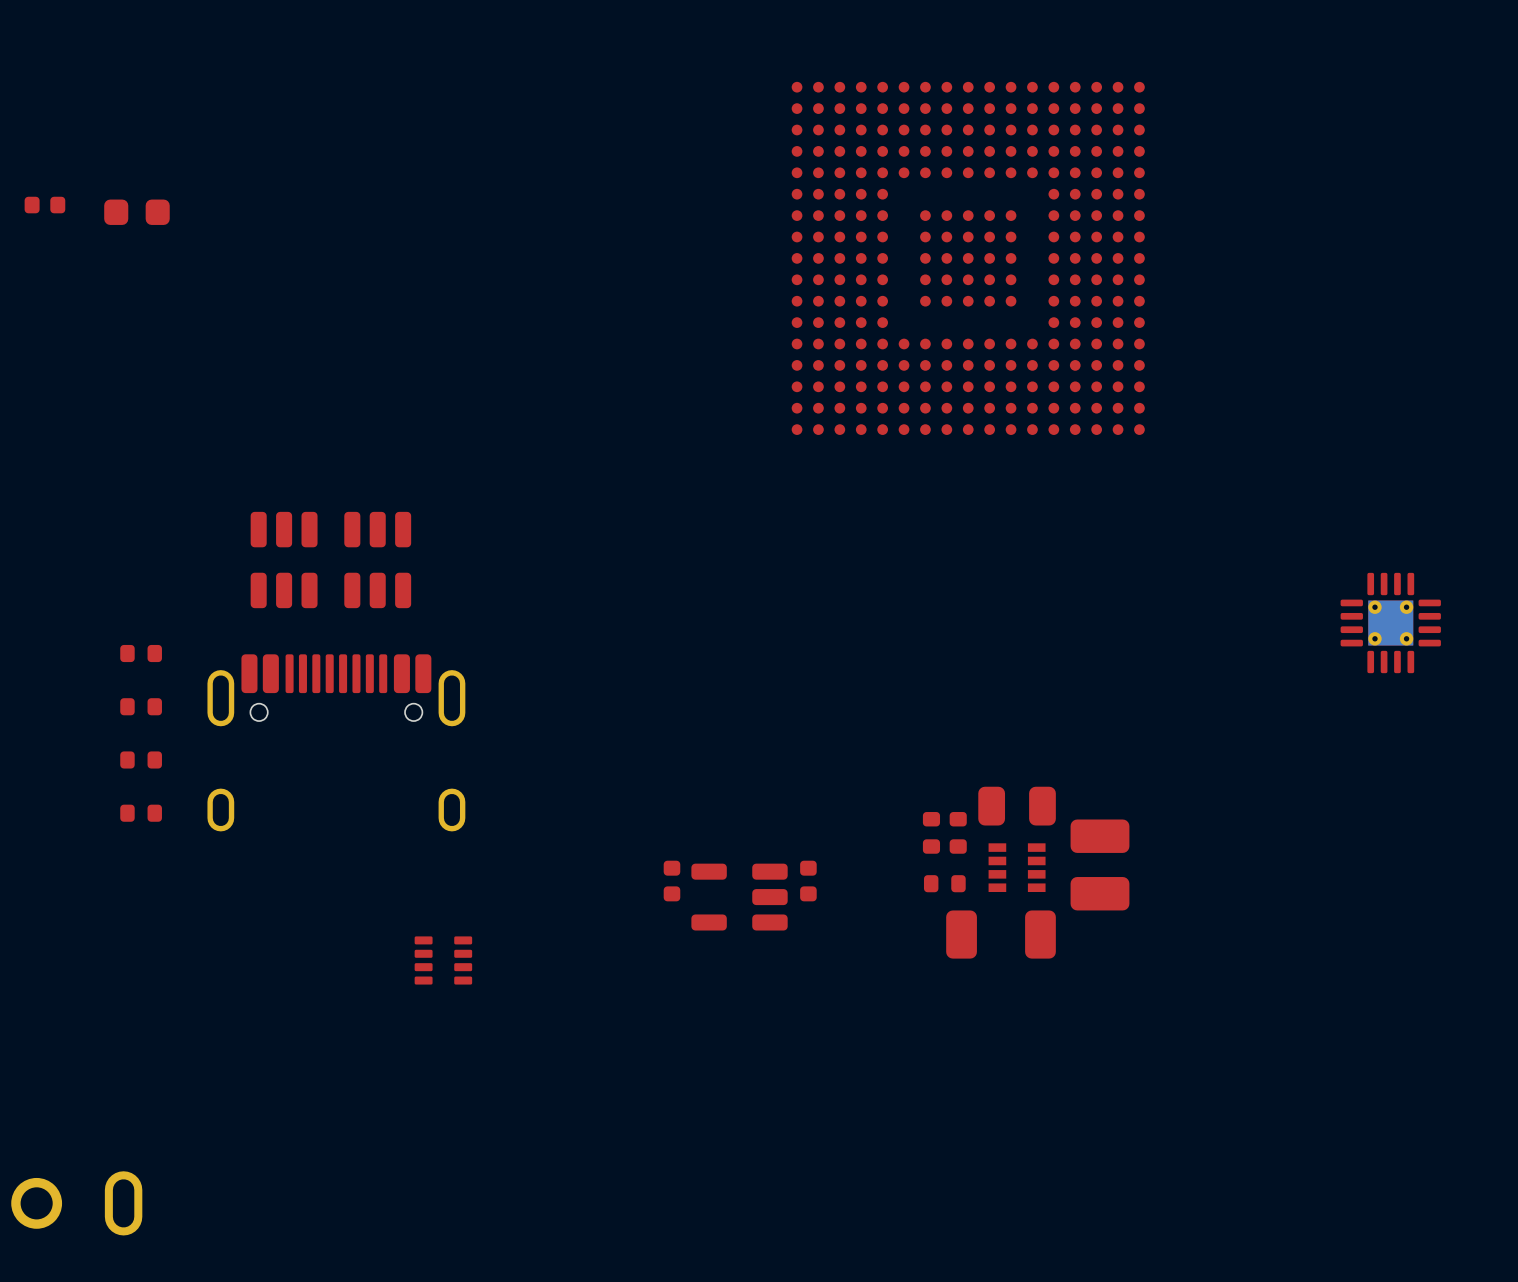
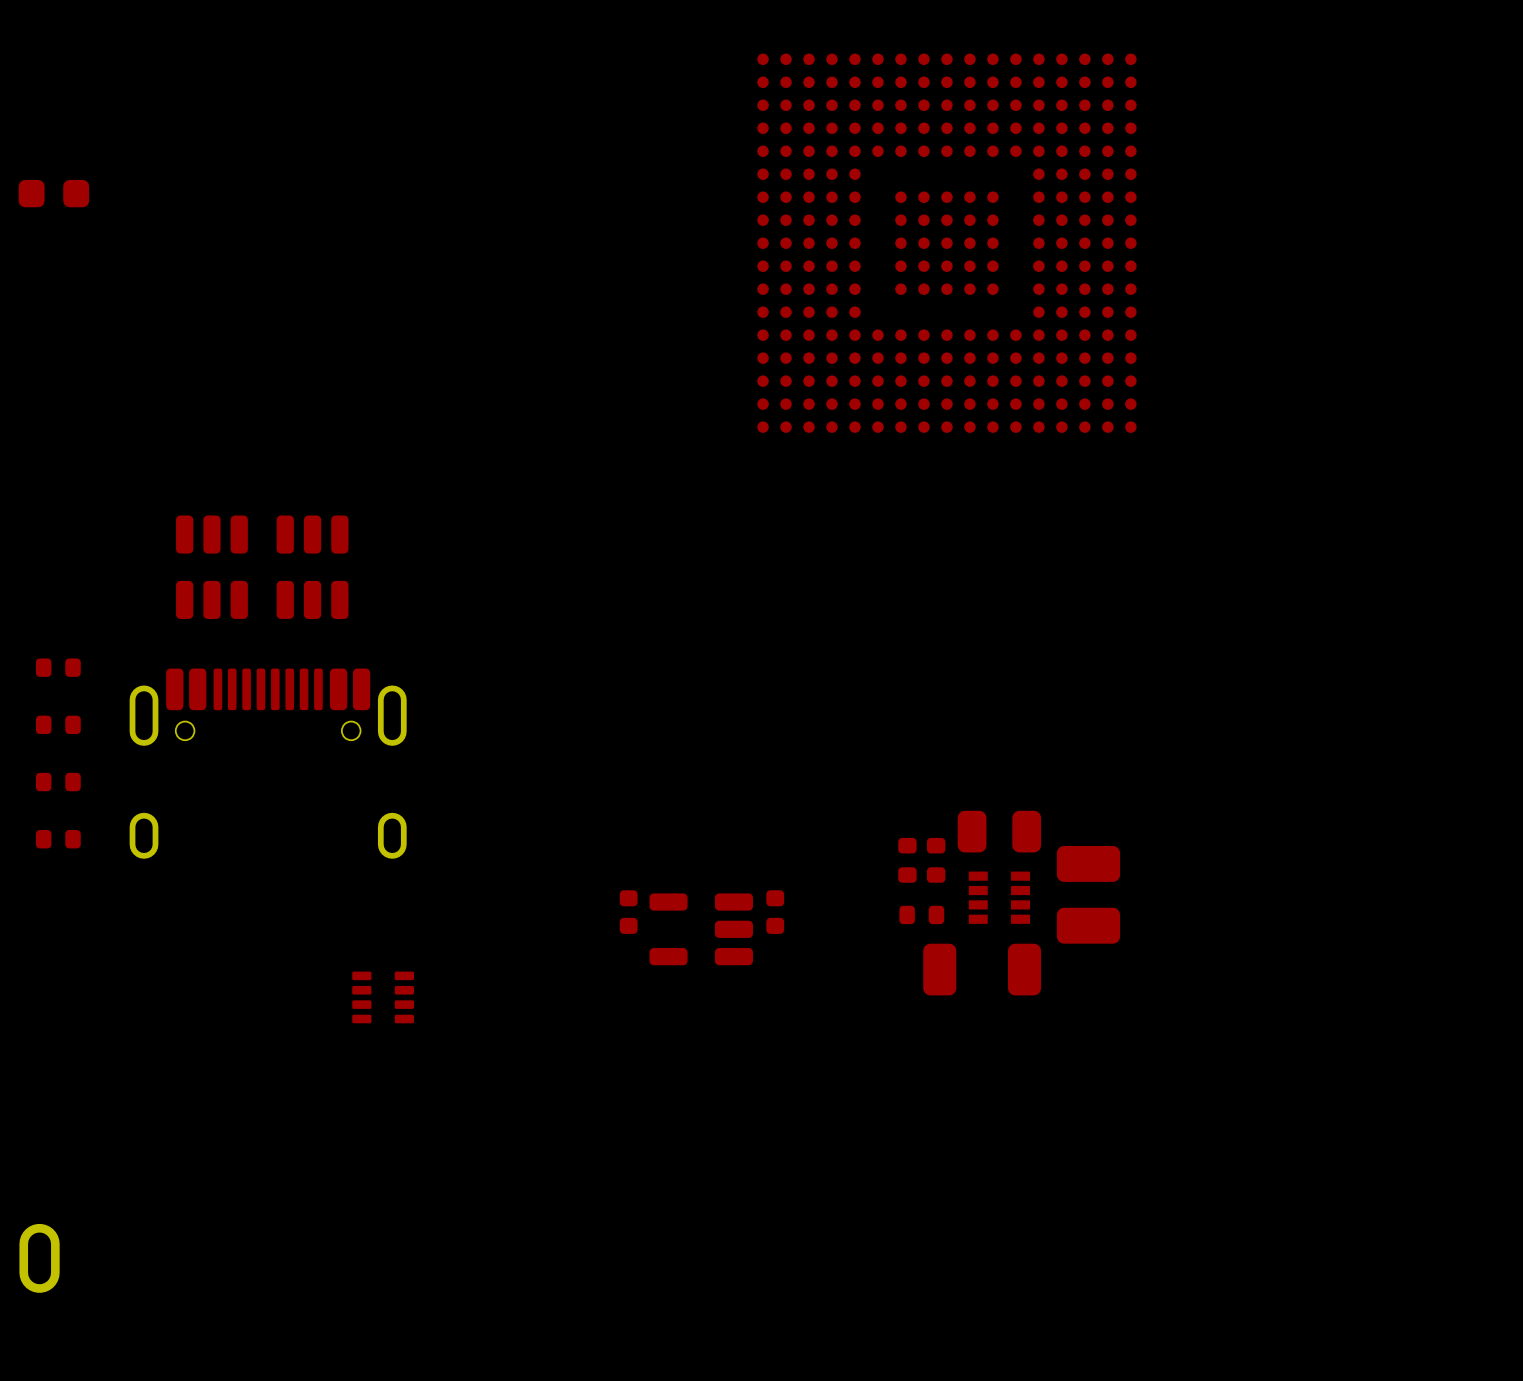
part: (1390, 623) -> none

